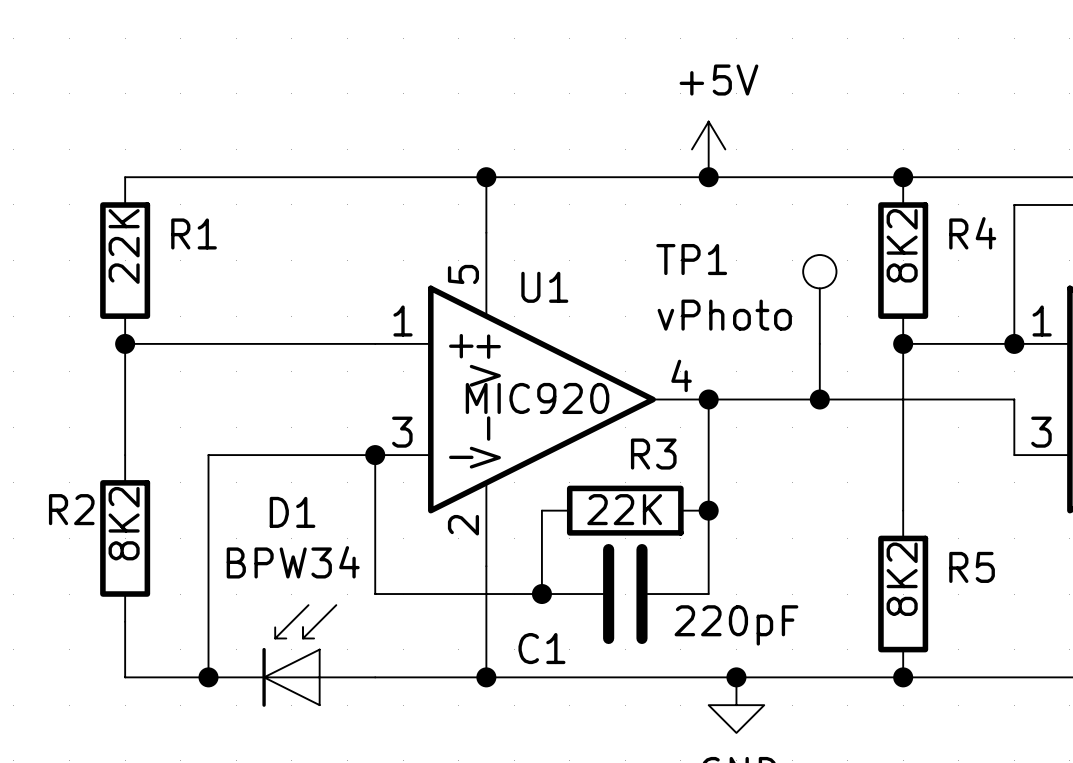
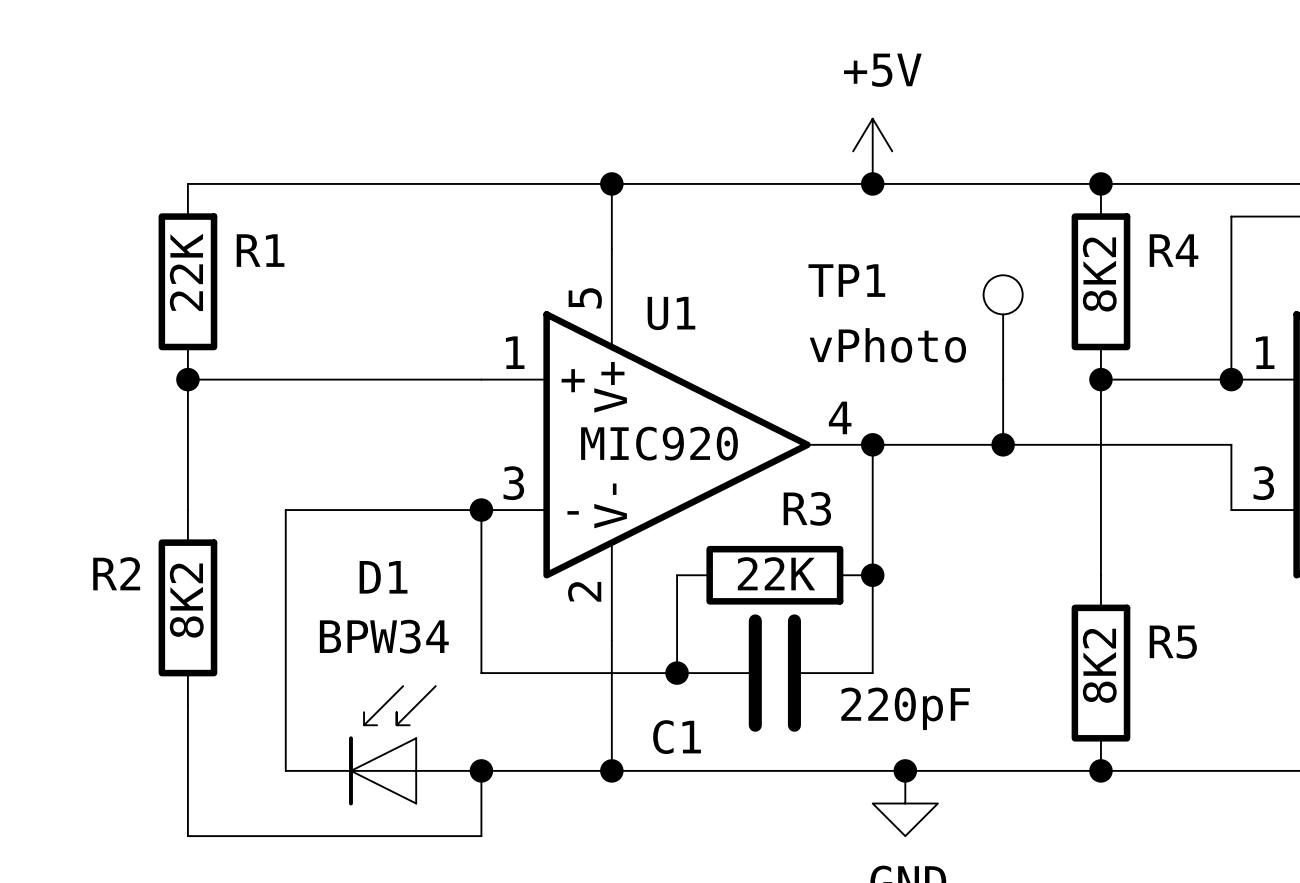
wire: (125, 677) (208, 677) -> (187, 770) (187, 836) (481, 836) (481, 770)
junction: (208, 677) -> none
junction: none -> (481, 770)

